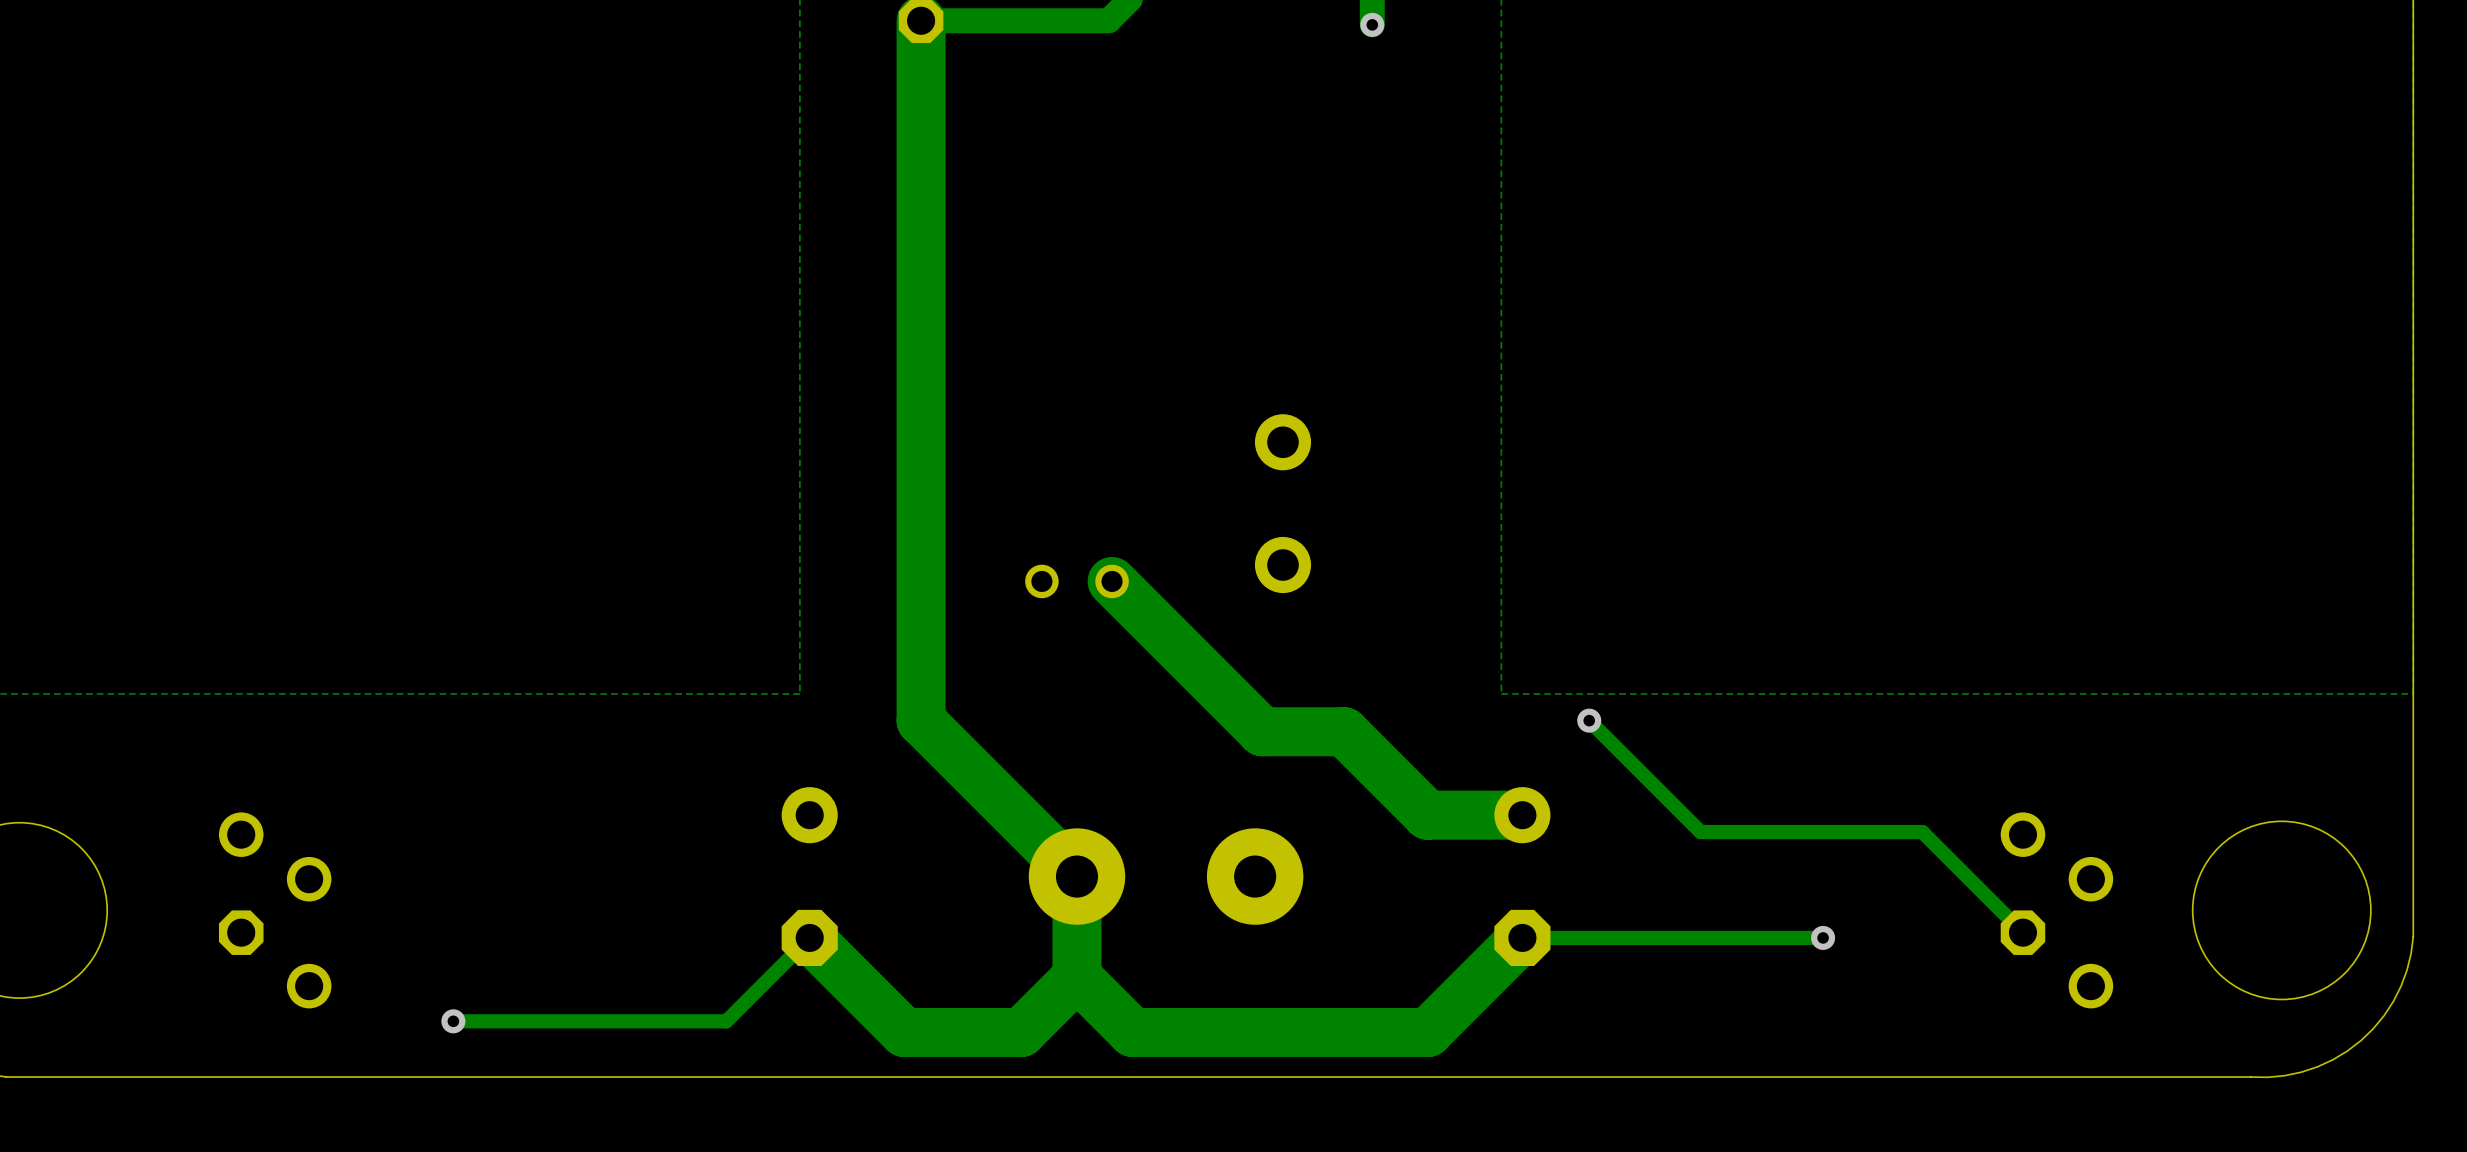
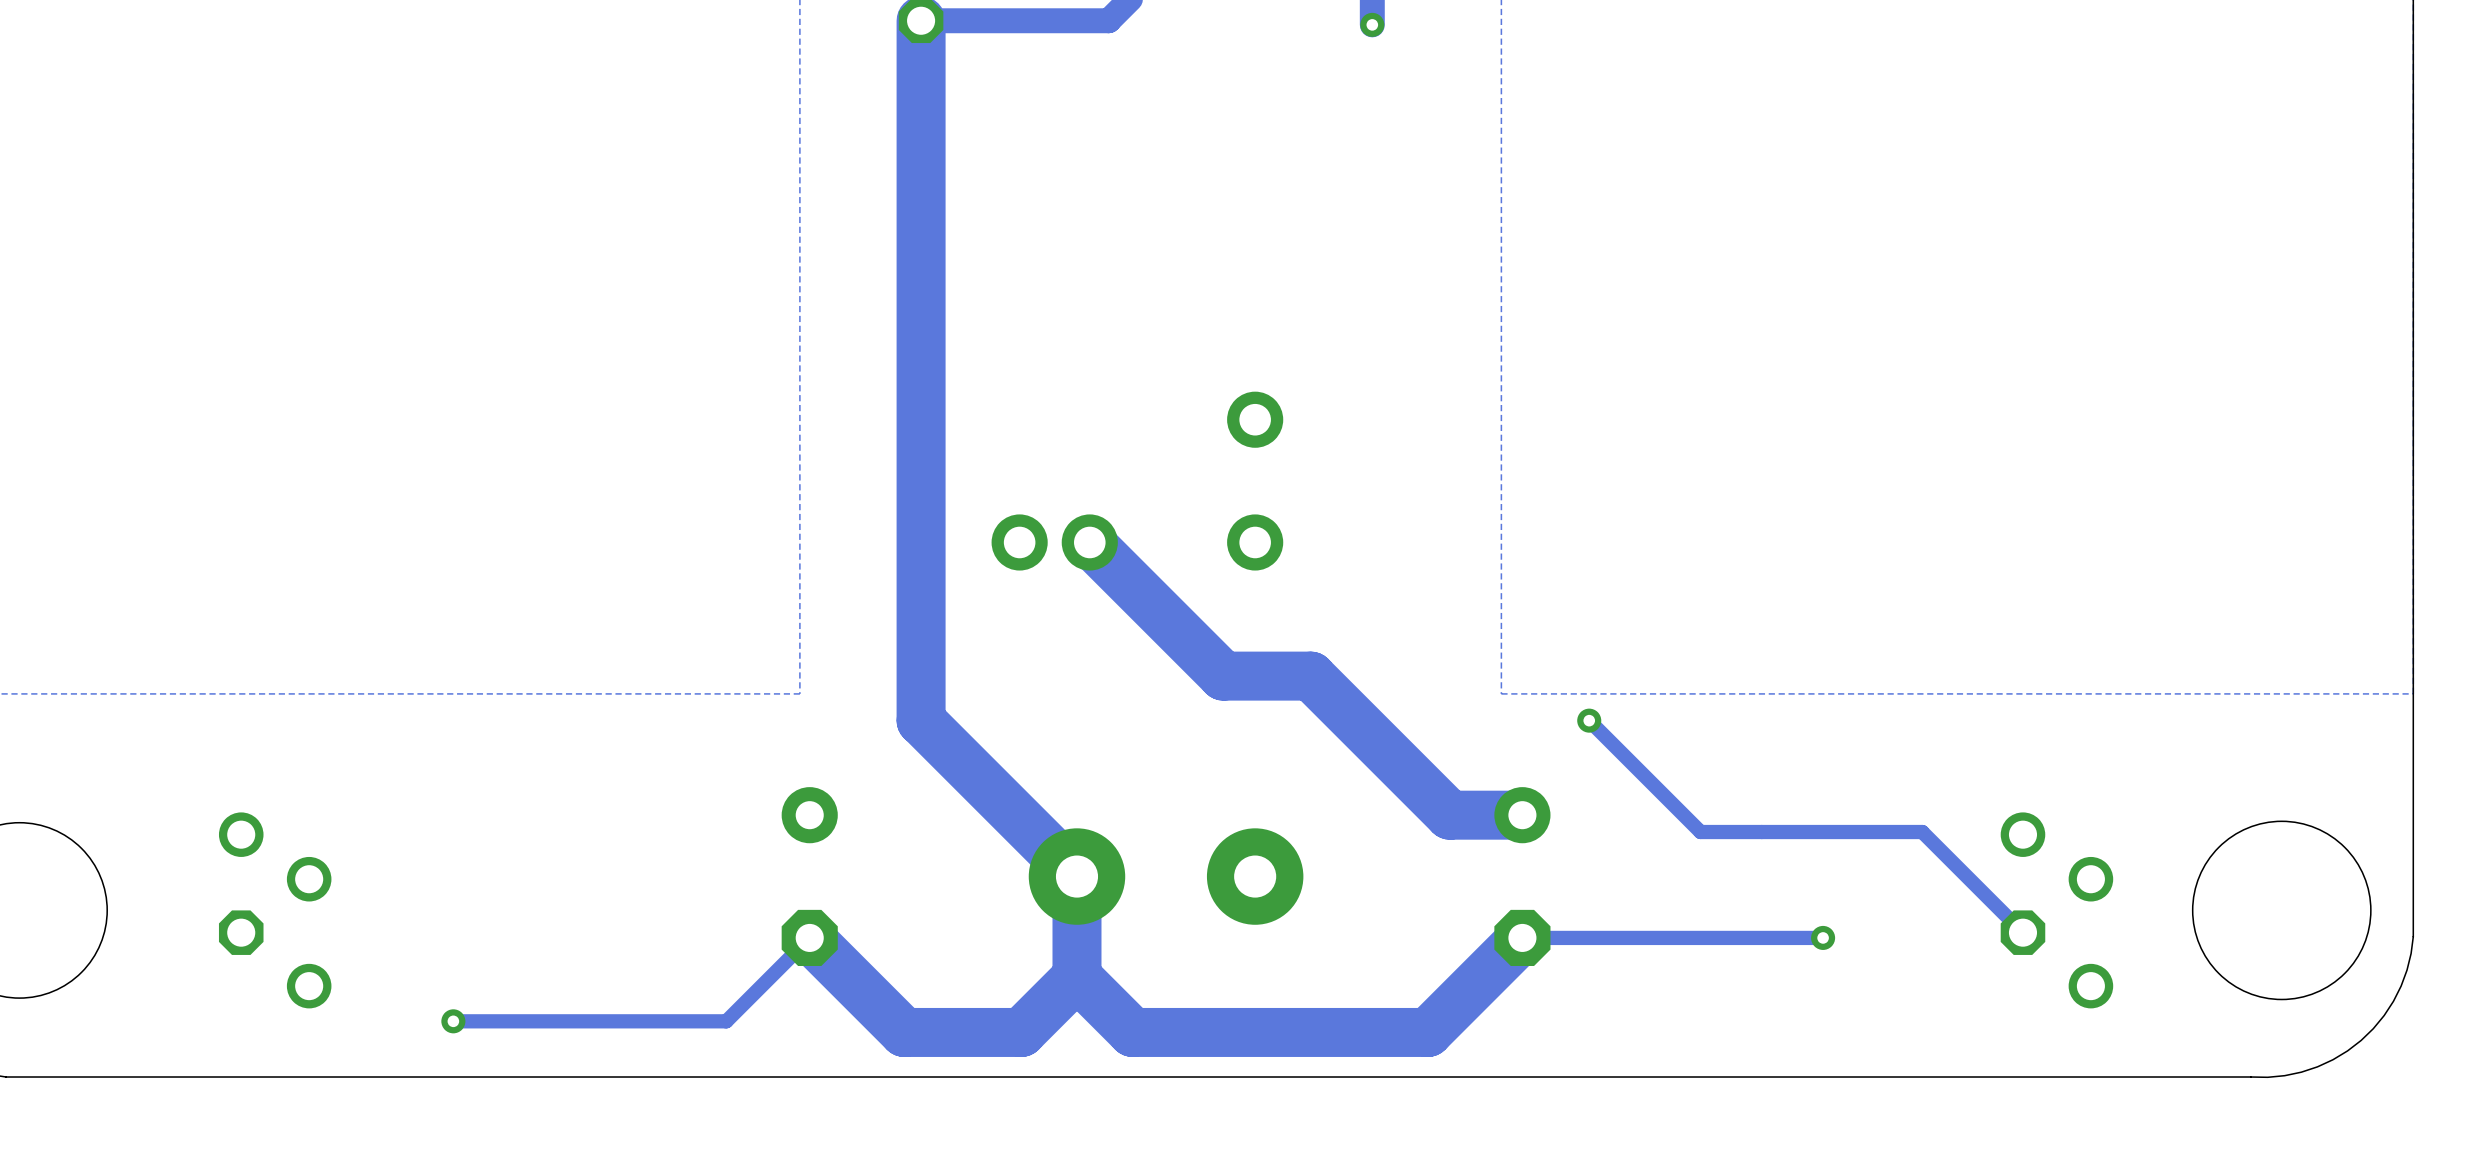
part position: (1283, 503) -> (1255, 481)
part: none -> (1054, 542)
part: (1076, 581) -> none
track: (1112, 581) (1262, 731) (1344, 731) (1427, 815) (1449, 815) -> (1089, 542) (1223, 676) (1310, 676) (1449, 815)

